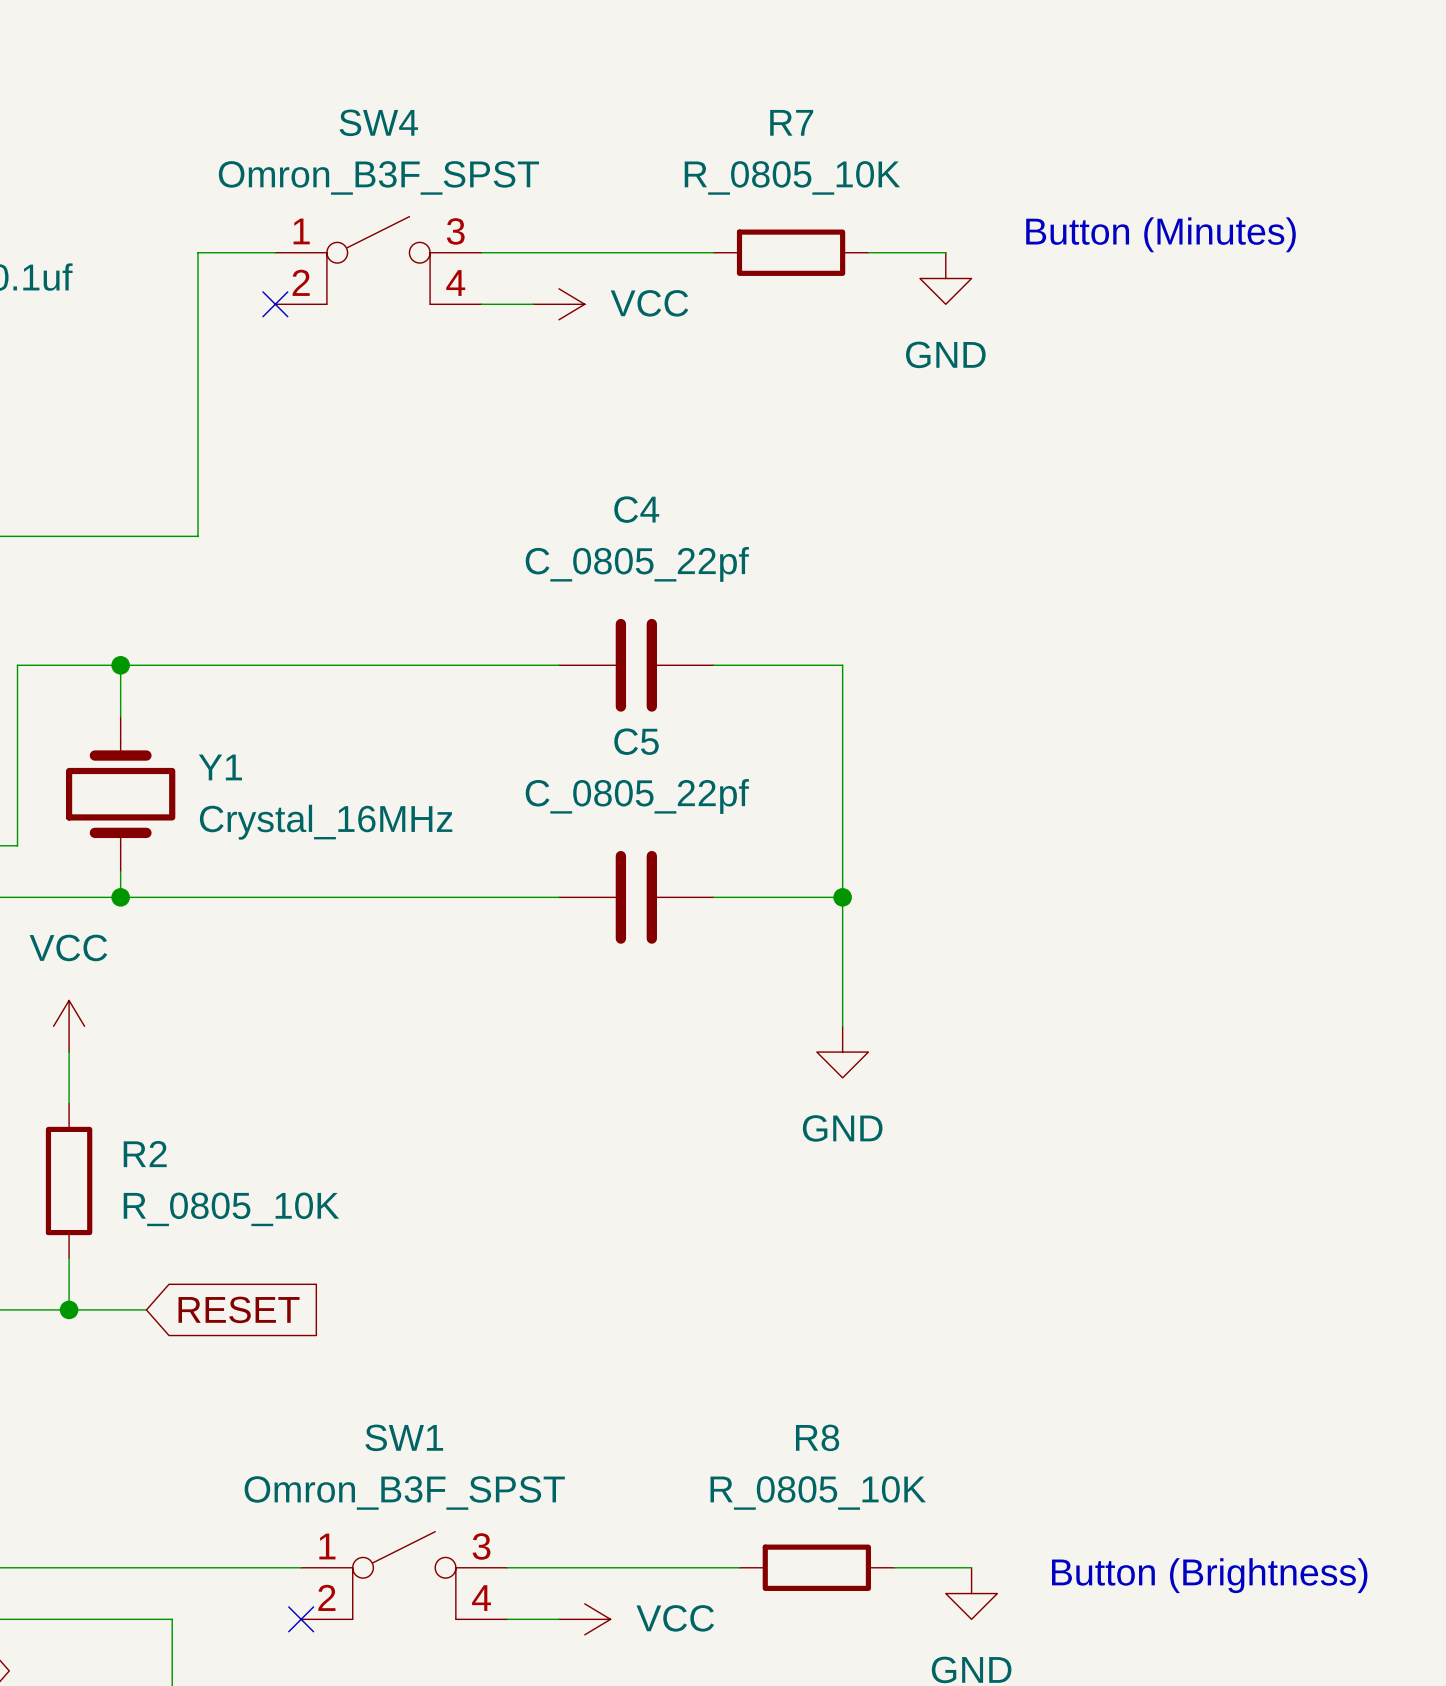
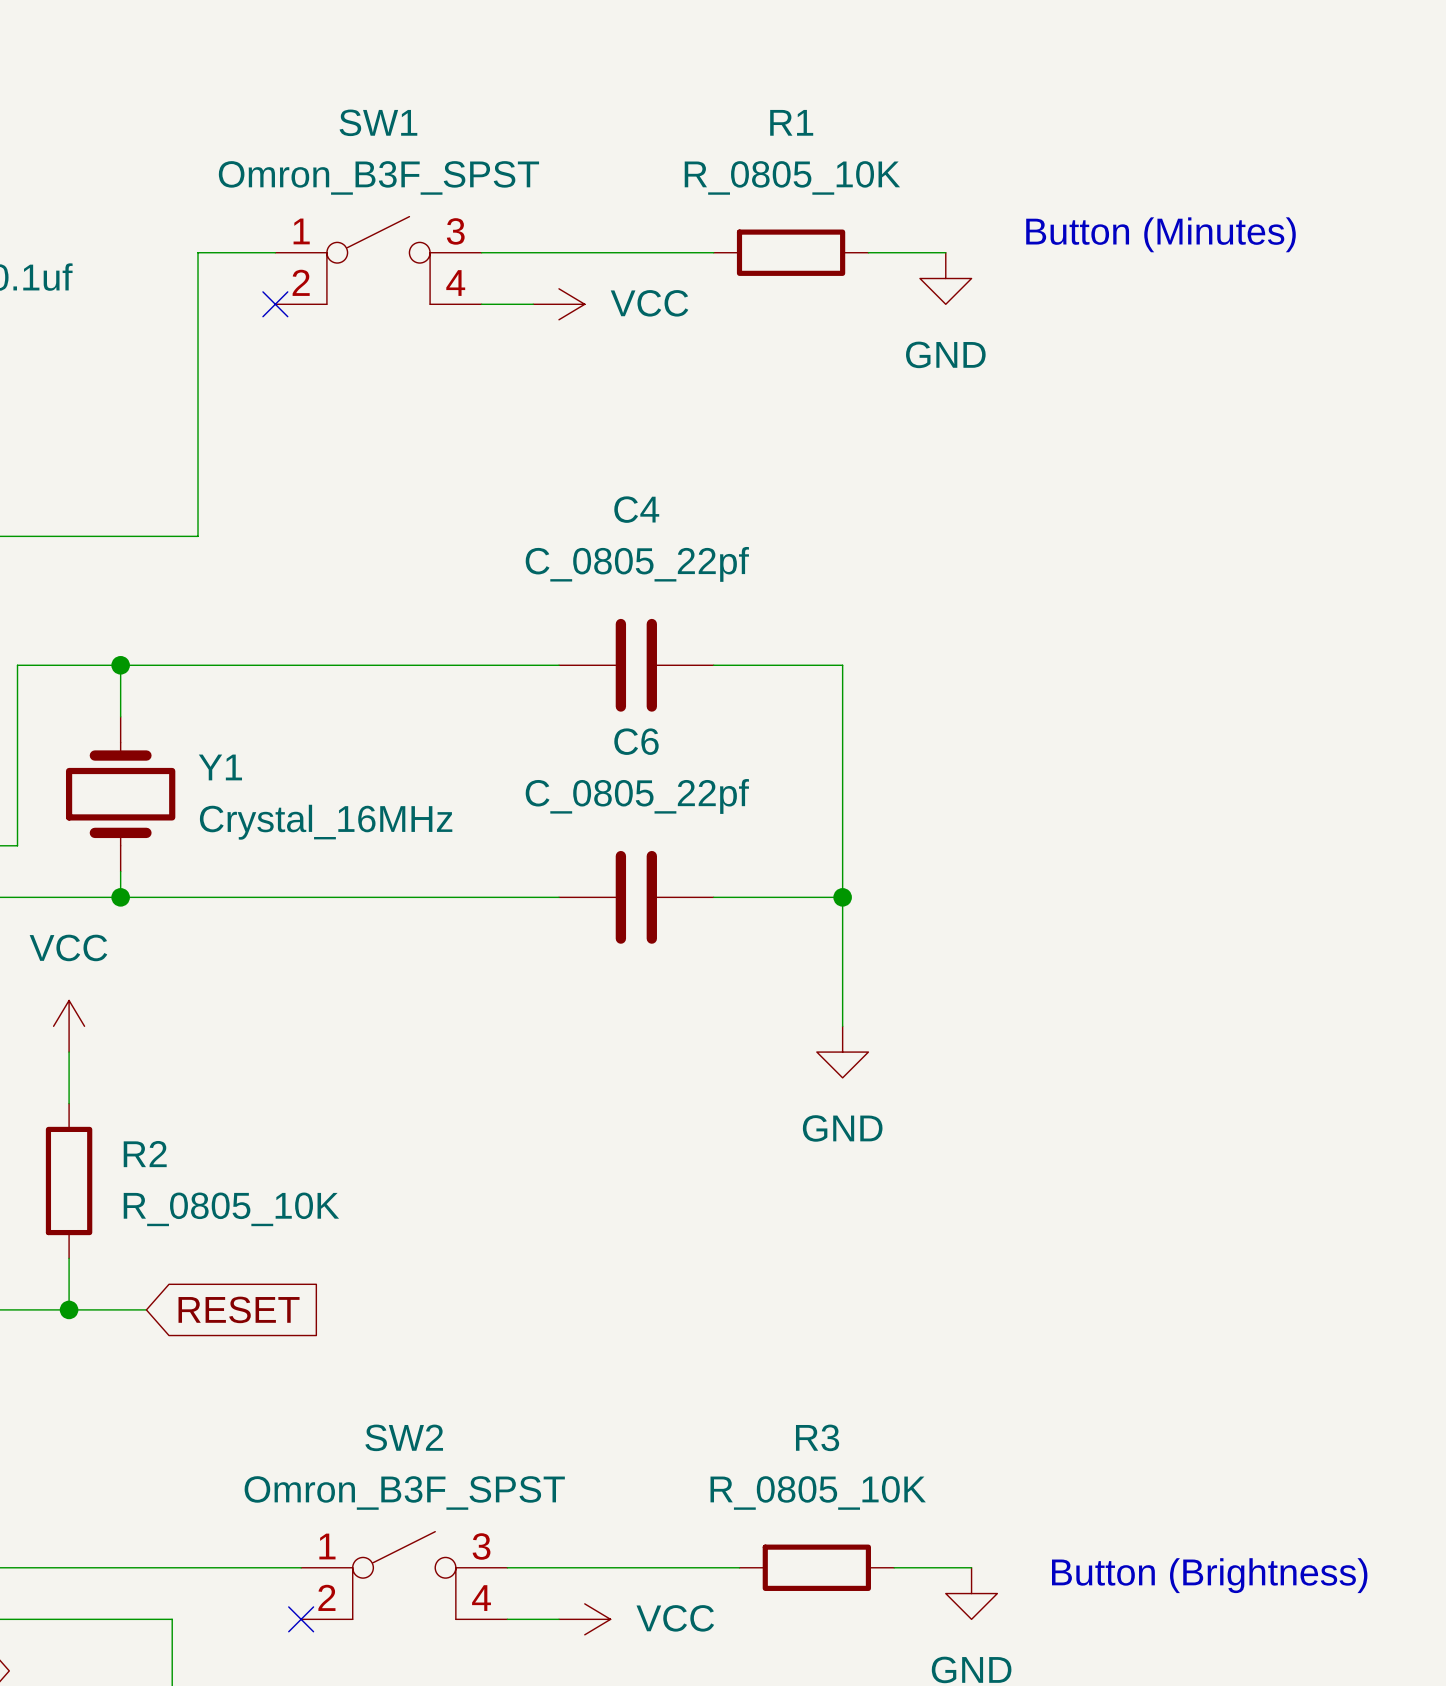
SW4 name: SW4 (378, 122) -> SW1 (378, 122)
R7 name: R7 (791, 122) -> R1 (791, 122)
C5 name: C5 (636, 741) -> C6 (636, 741)
SW1 name: SW1 (404, 1437) -> SW2 (404, 1437)
R8 name: R8 (817, 1437) -> R3 (817, 1437)

